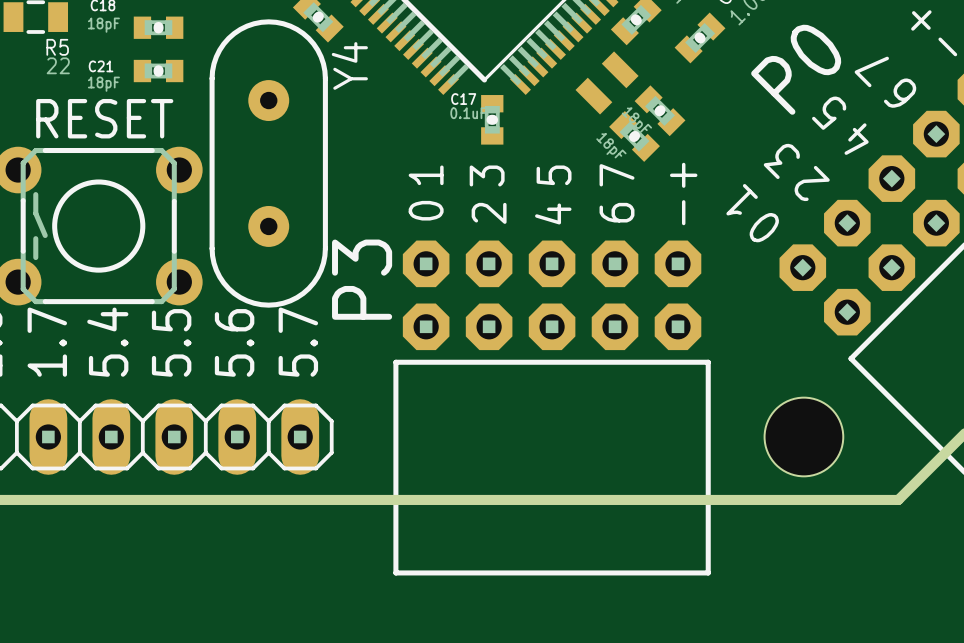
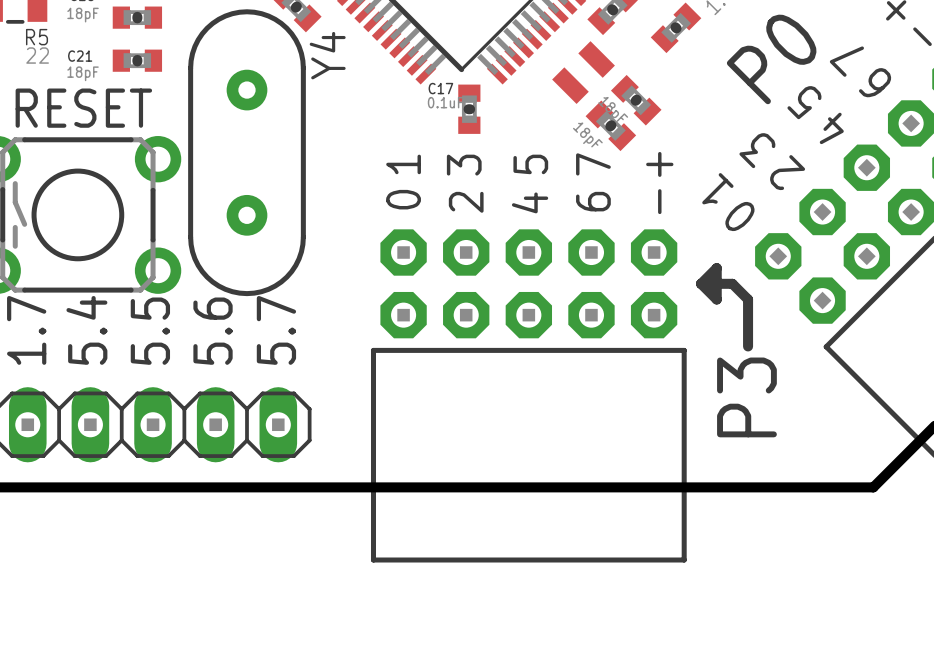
text position: P3 (362, 279) -> P3 (746, 397)
line: none -> (701, 283) (732, 283) (748, 299) (748, 346)
line: none -> (701, 283) (716, 268) (716, 299) (701, 283)
hole: (803, 436) -> none

